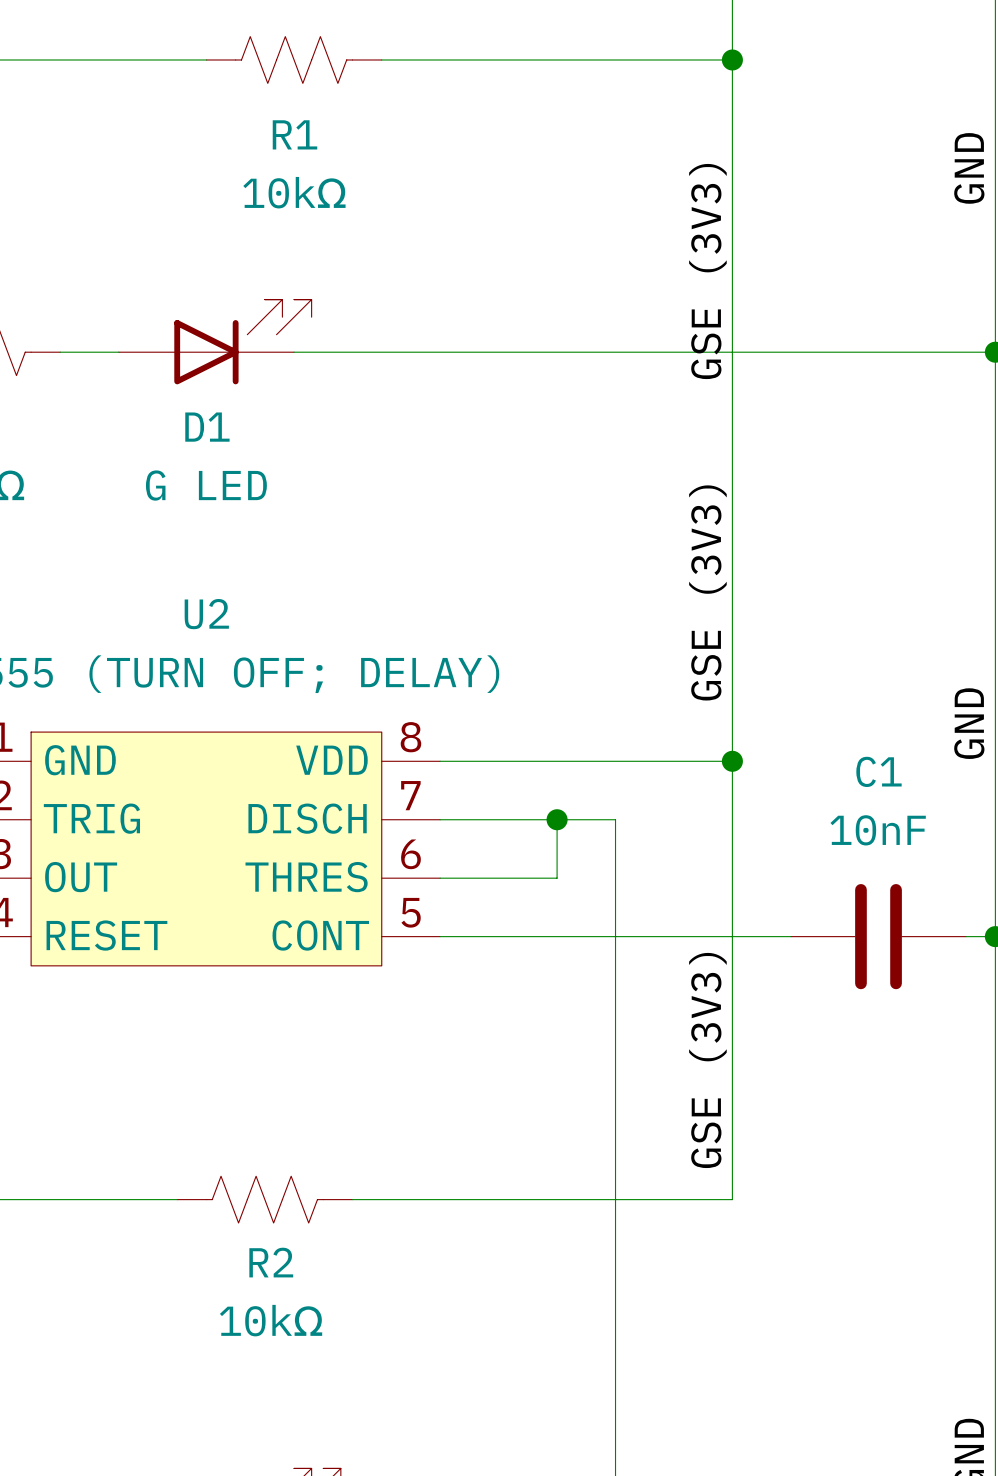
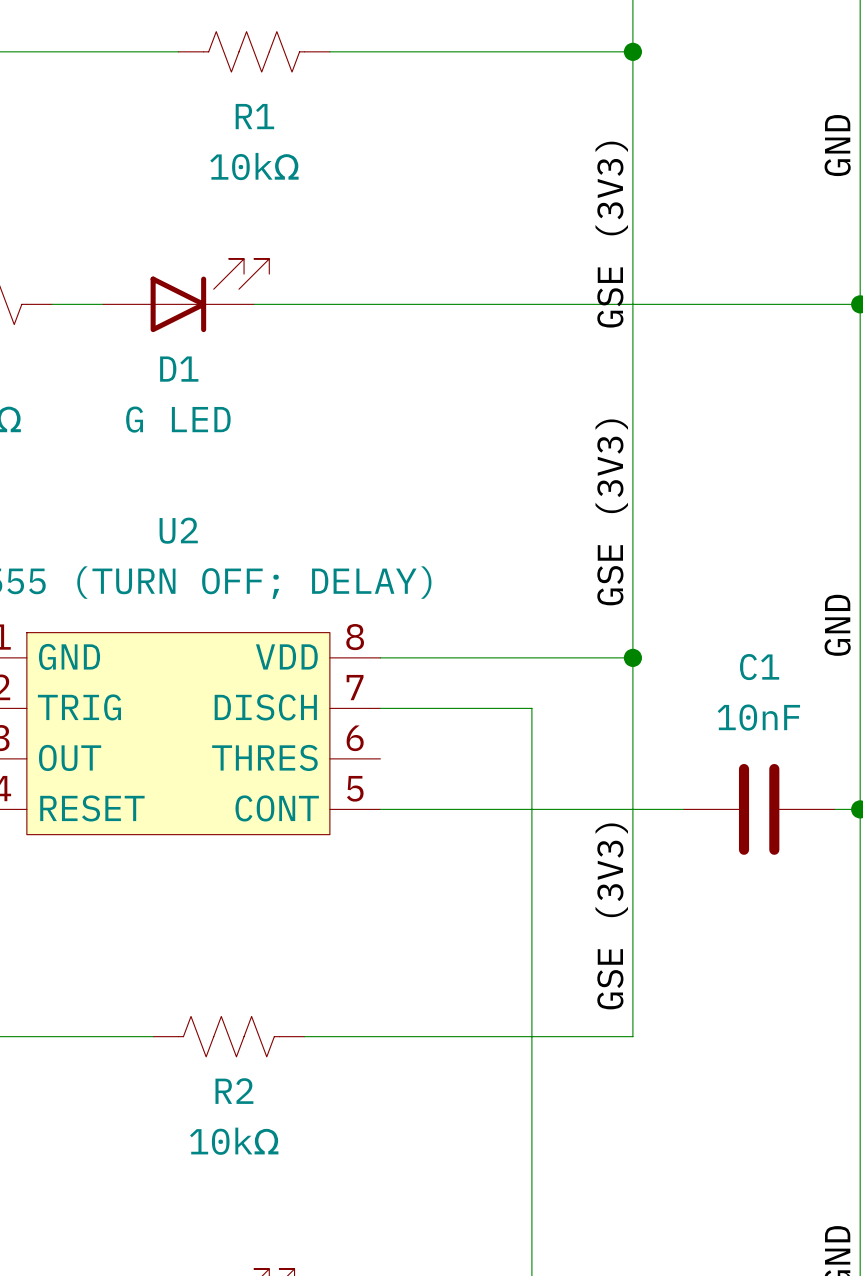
wire: (557, 819) (557, 878) (440, 878) -> none
junction: (557, 819) -> none

